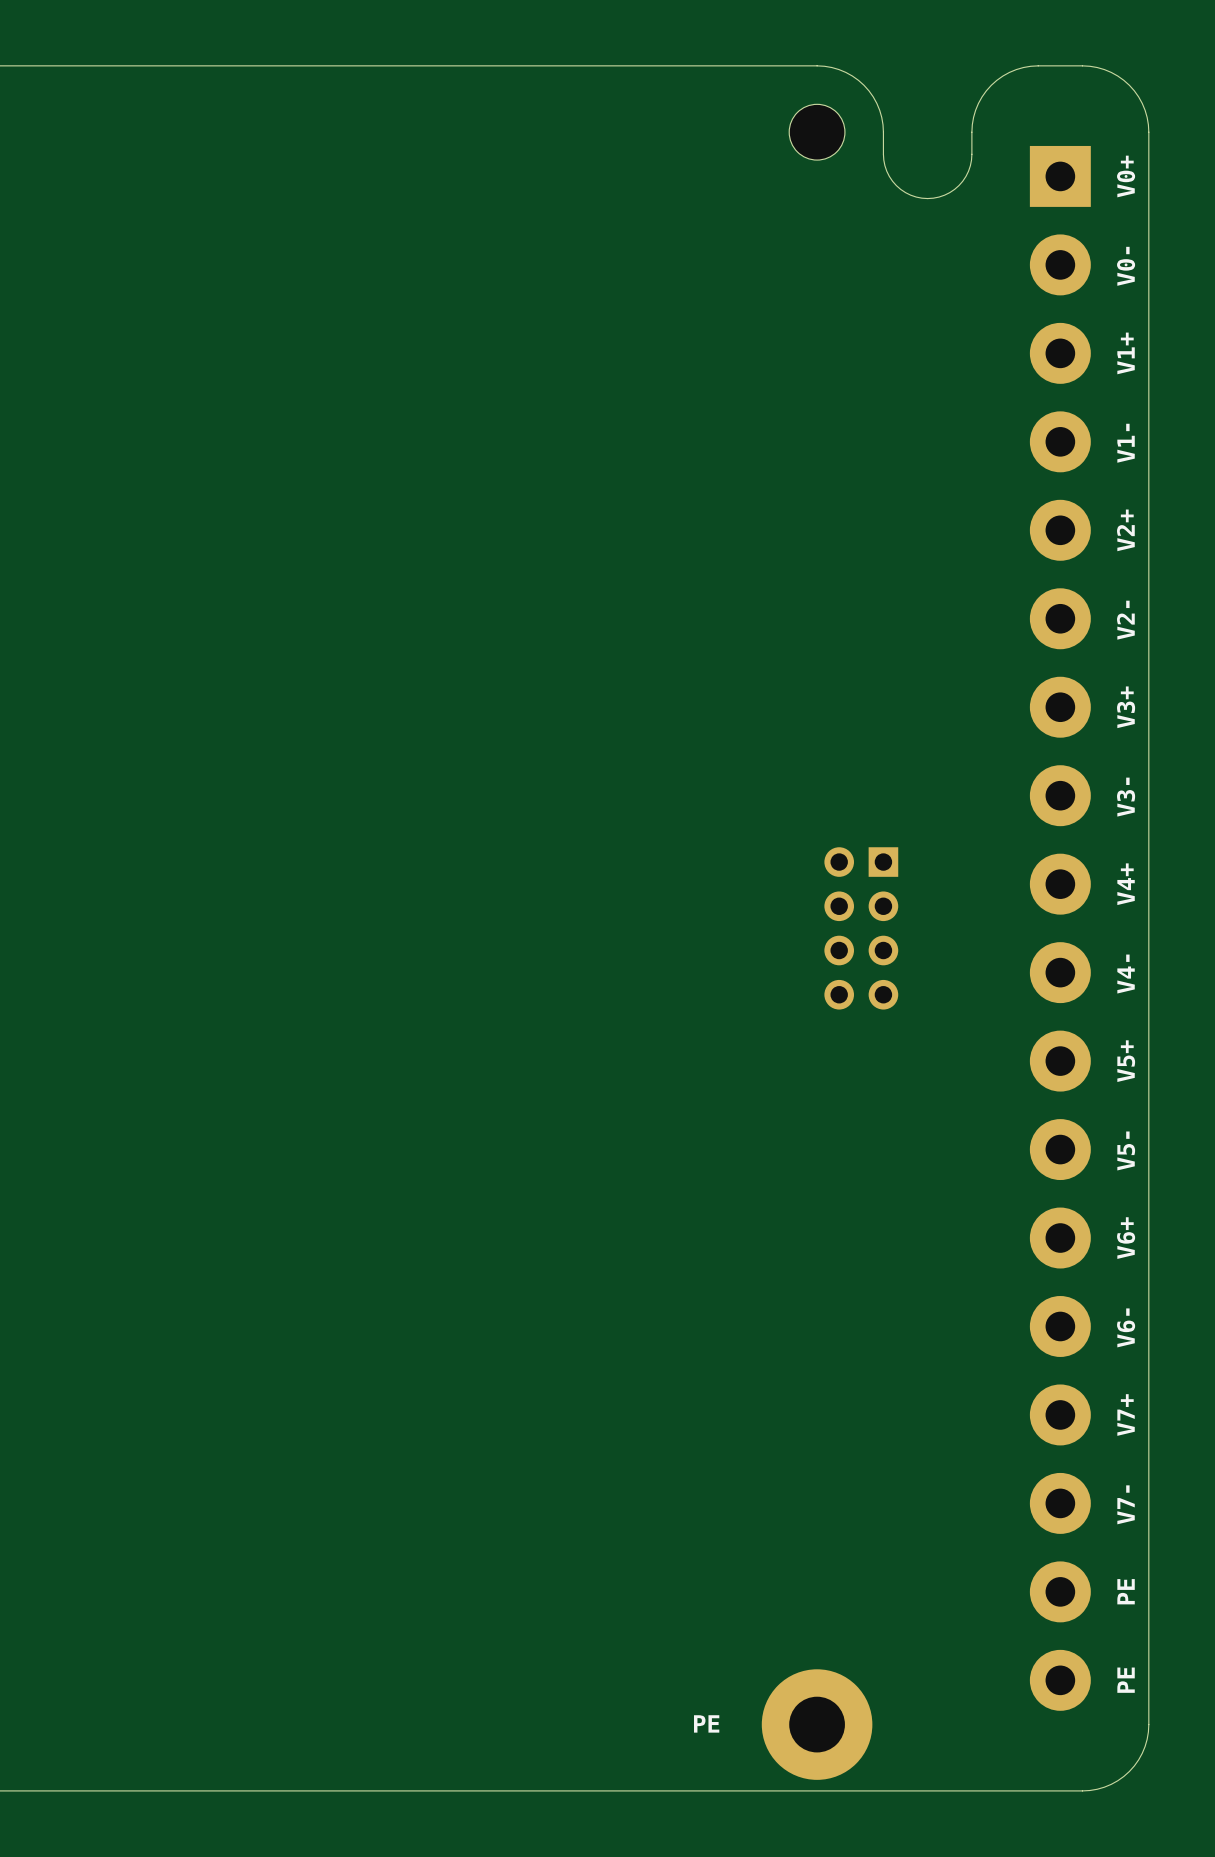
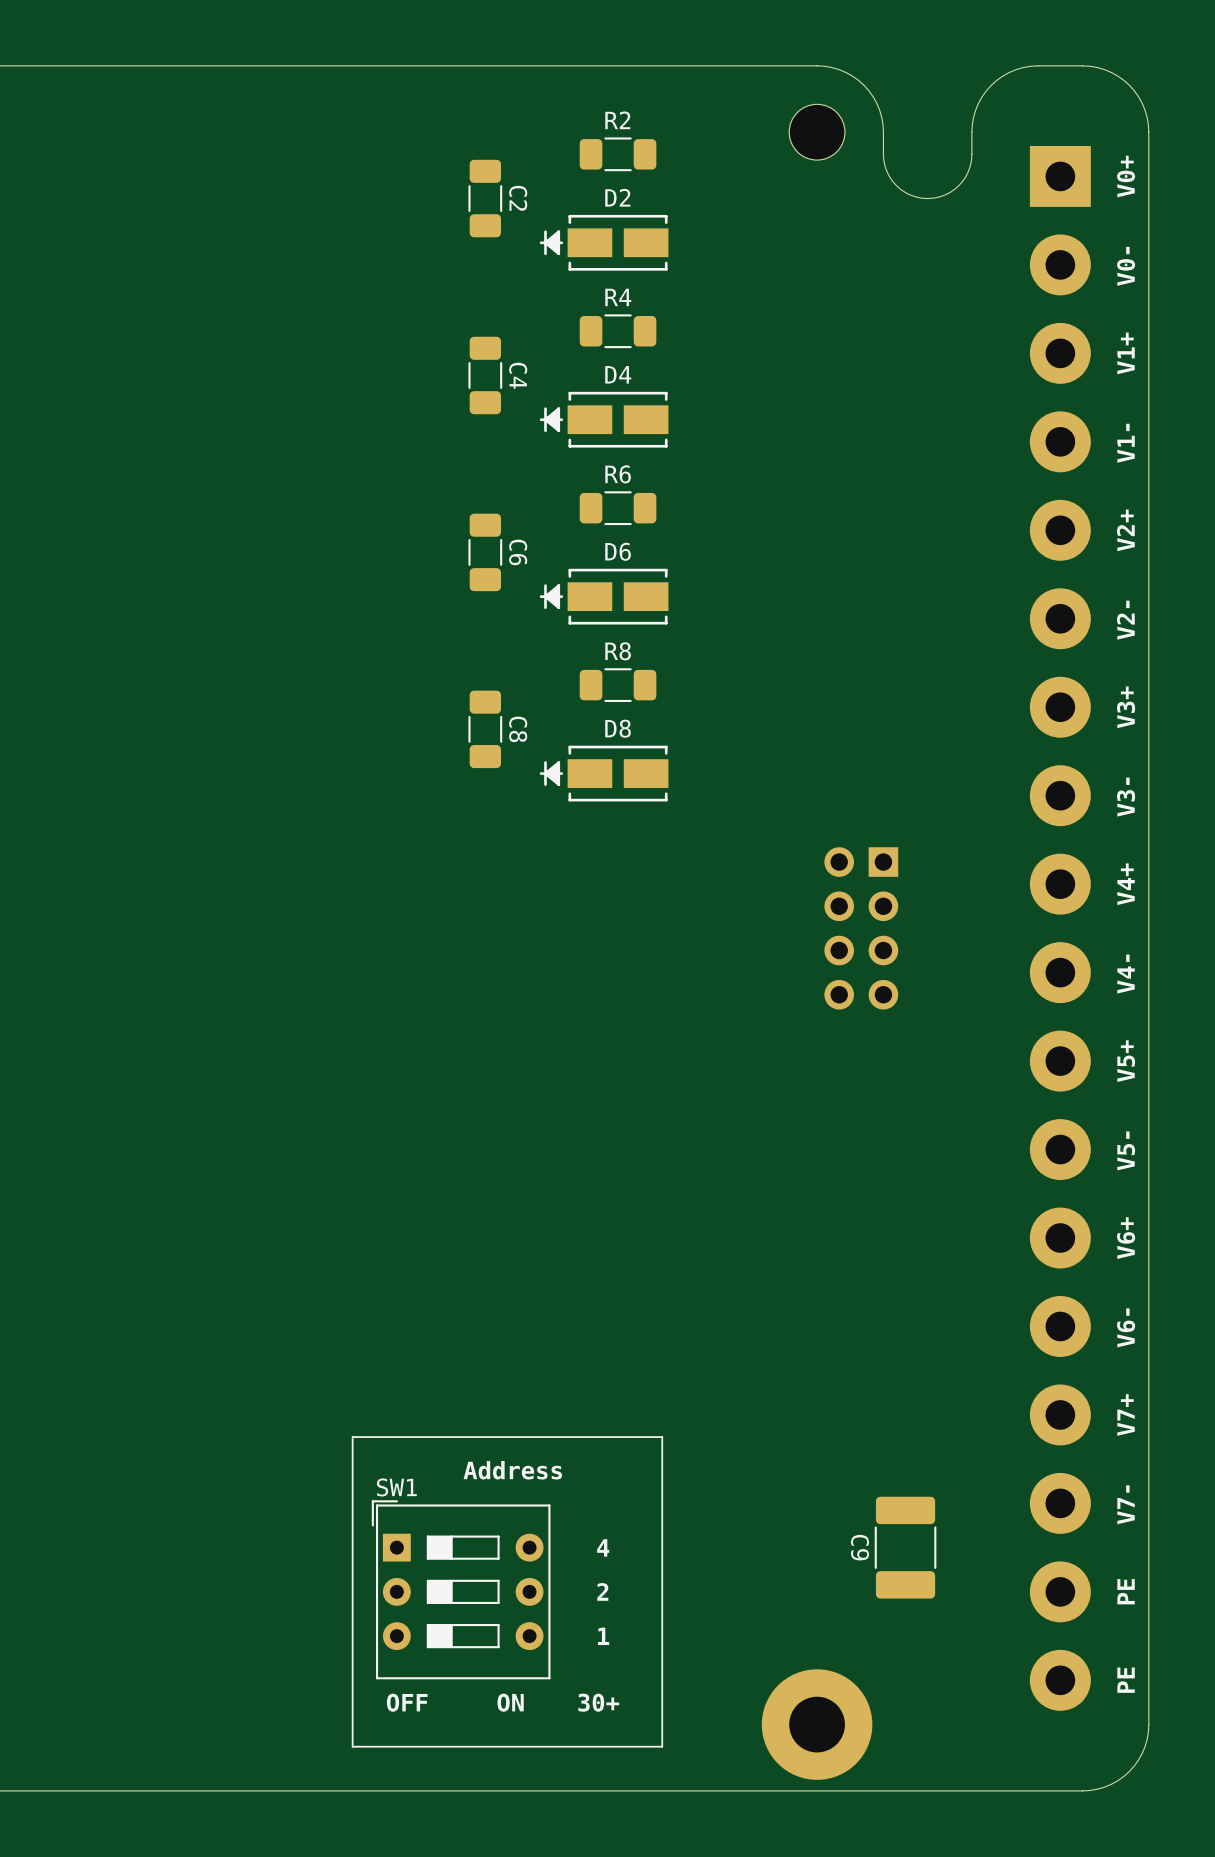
R2: none -> (618, 154)
C2: none -> (485, 198)
D2: none -> (604, 242)
R4: none -> (618, 331)
C4: none -> (485, 375)
D4: none -> (604, 419)
R6: none -> (618, 508)
C6: none -> (485, 552)
D6: none -> (604, 596)
R8: none -> (618, 685)
C8: none -> (485, 729)
D8: none -> (604, 773)
line: none -> (662, 1437) (352, 1437) (352, 1746) (662, 1746) (662, 1437)
text: none -> Address (512, 1470)
text: none -> 4 (603, 1547)
C9: none -> (905, 1547)
SW1: none -> (461, 1589)
text: none -> 2 (602, 1591)
text: none -> 1 (603, 1636)
text: none -> OFF (407, 1702)
text: none -> ON (510, 1702)
text: none -> 30+ (598, 1702)
text: PE (706, 1723) -> none

